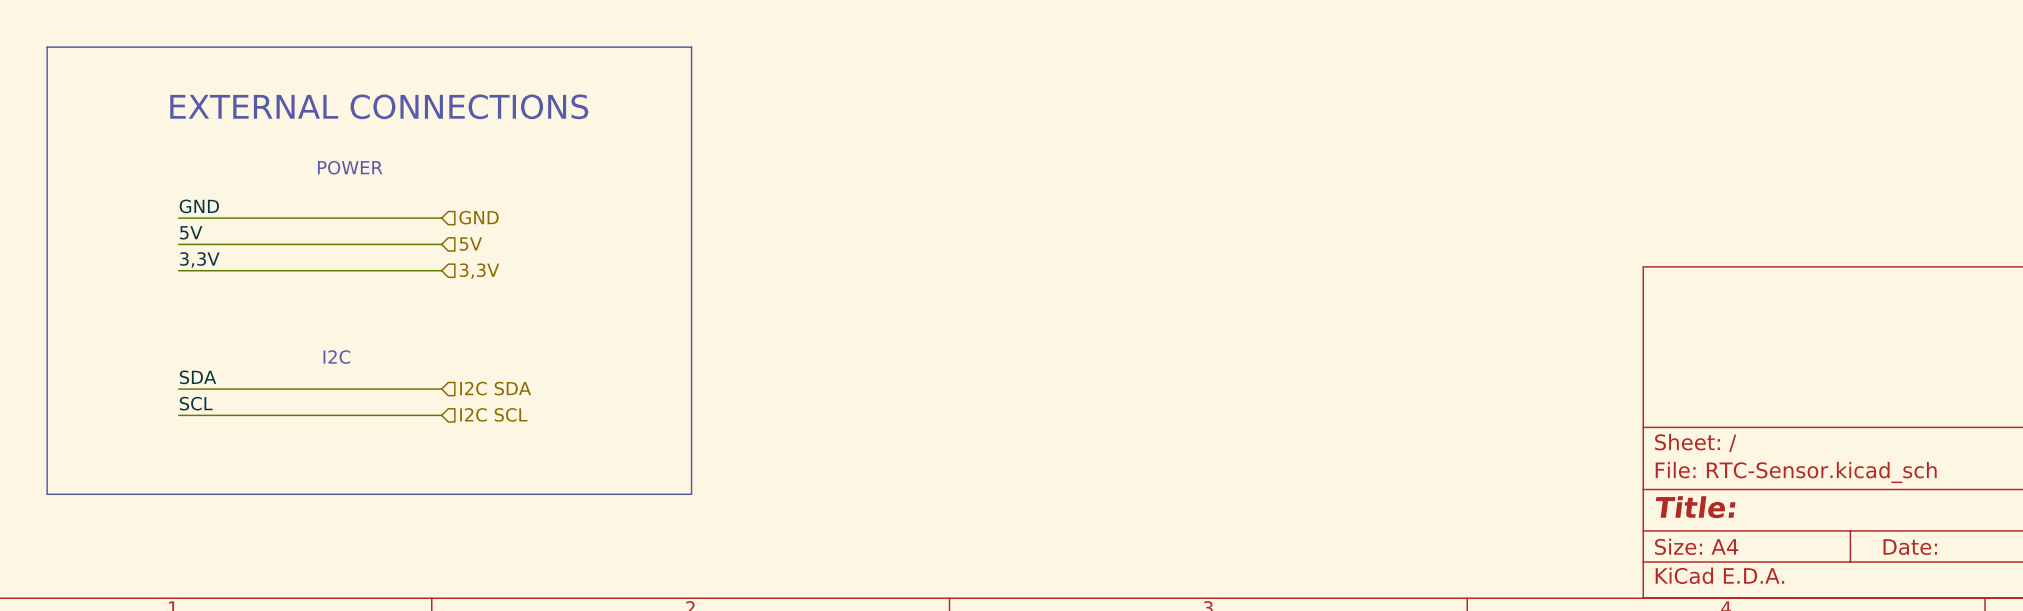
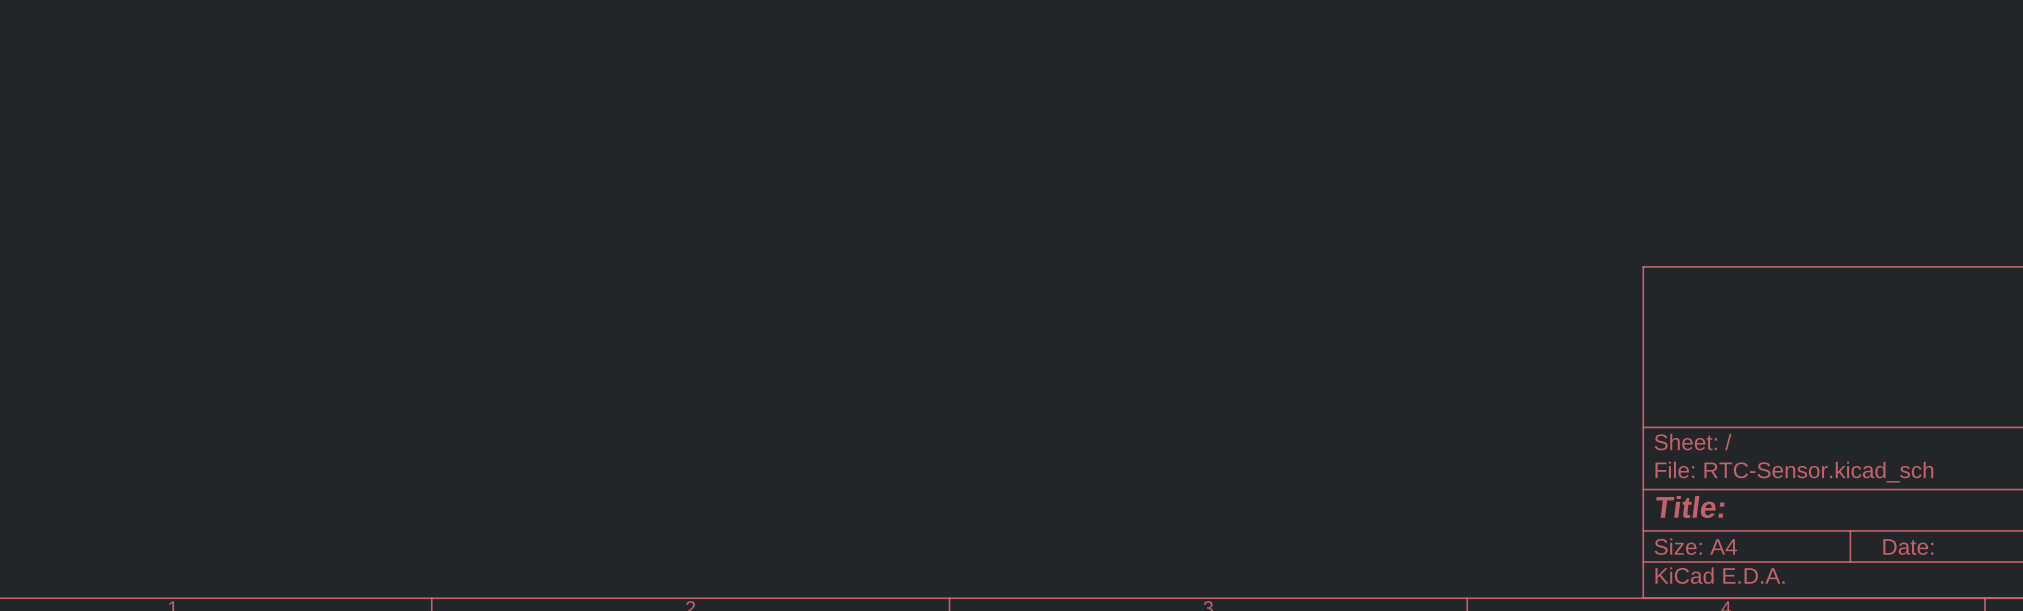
bus: (47, 47) (691, 47) (691, 494) (47, 494) (47, 47) -> none
text: EXTERNAL CONNECTIONS (379, 106) -> none
text: POWER (350, 167) -> none
label: GND (199, 206) -> none
hierarchical label: GND (479, 217) -> none
wire: (178, 218) (441, 218) -> none
label: 5V (191, 232) -> none
wire: (178, 244) (441, 244) -> none
hierarchical label: 5V (470, 244) -> none
label: 3,3V (199, 259) -> none
wire: (178, 270) (441, 270) -> none
hierarchical label: 3,3V (479, 271) -> none
text: I2C (336, 357) -> none
label: SDA (198, 377) -> none
hierarchical label: I2C SDA (495, 388) -> none
wire: (178, 389) (441, 389) -> none
label: SCL (196, 403) -> none
hierarchical label: I2C SCL (493, 414) -> none
wire: (178, 415) (441, 415) -> none

